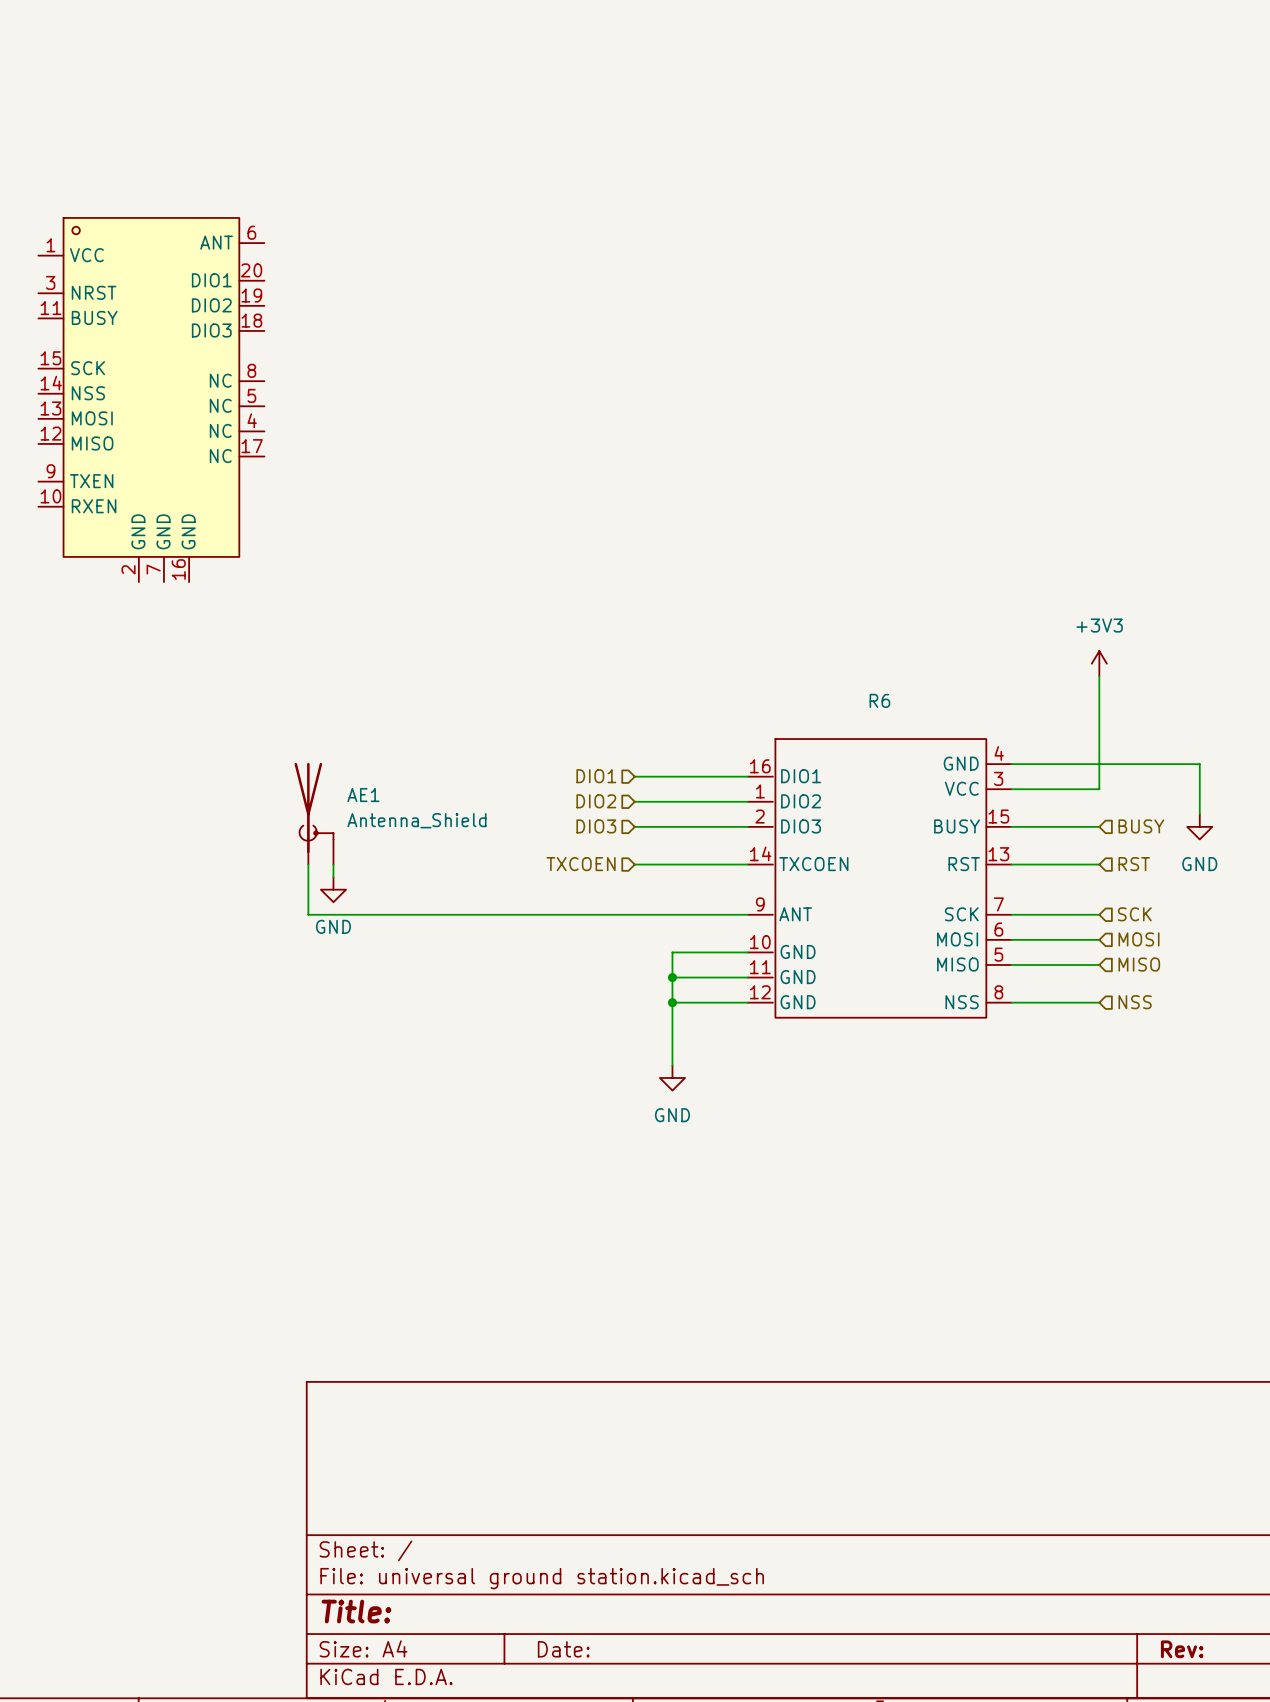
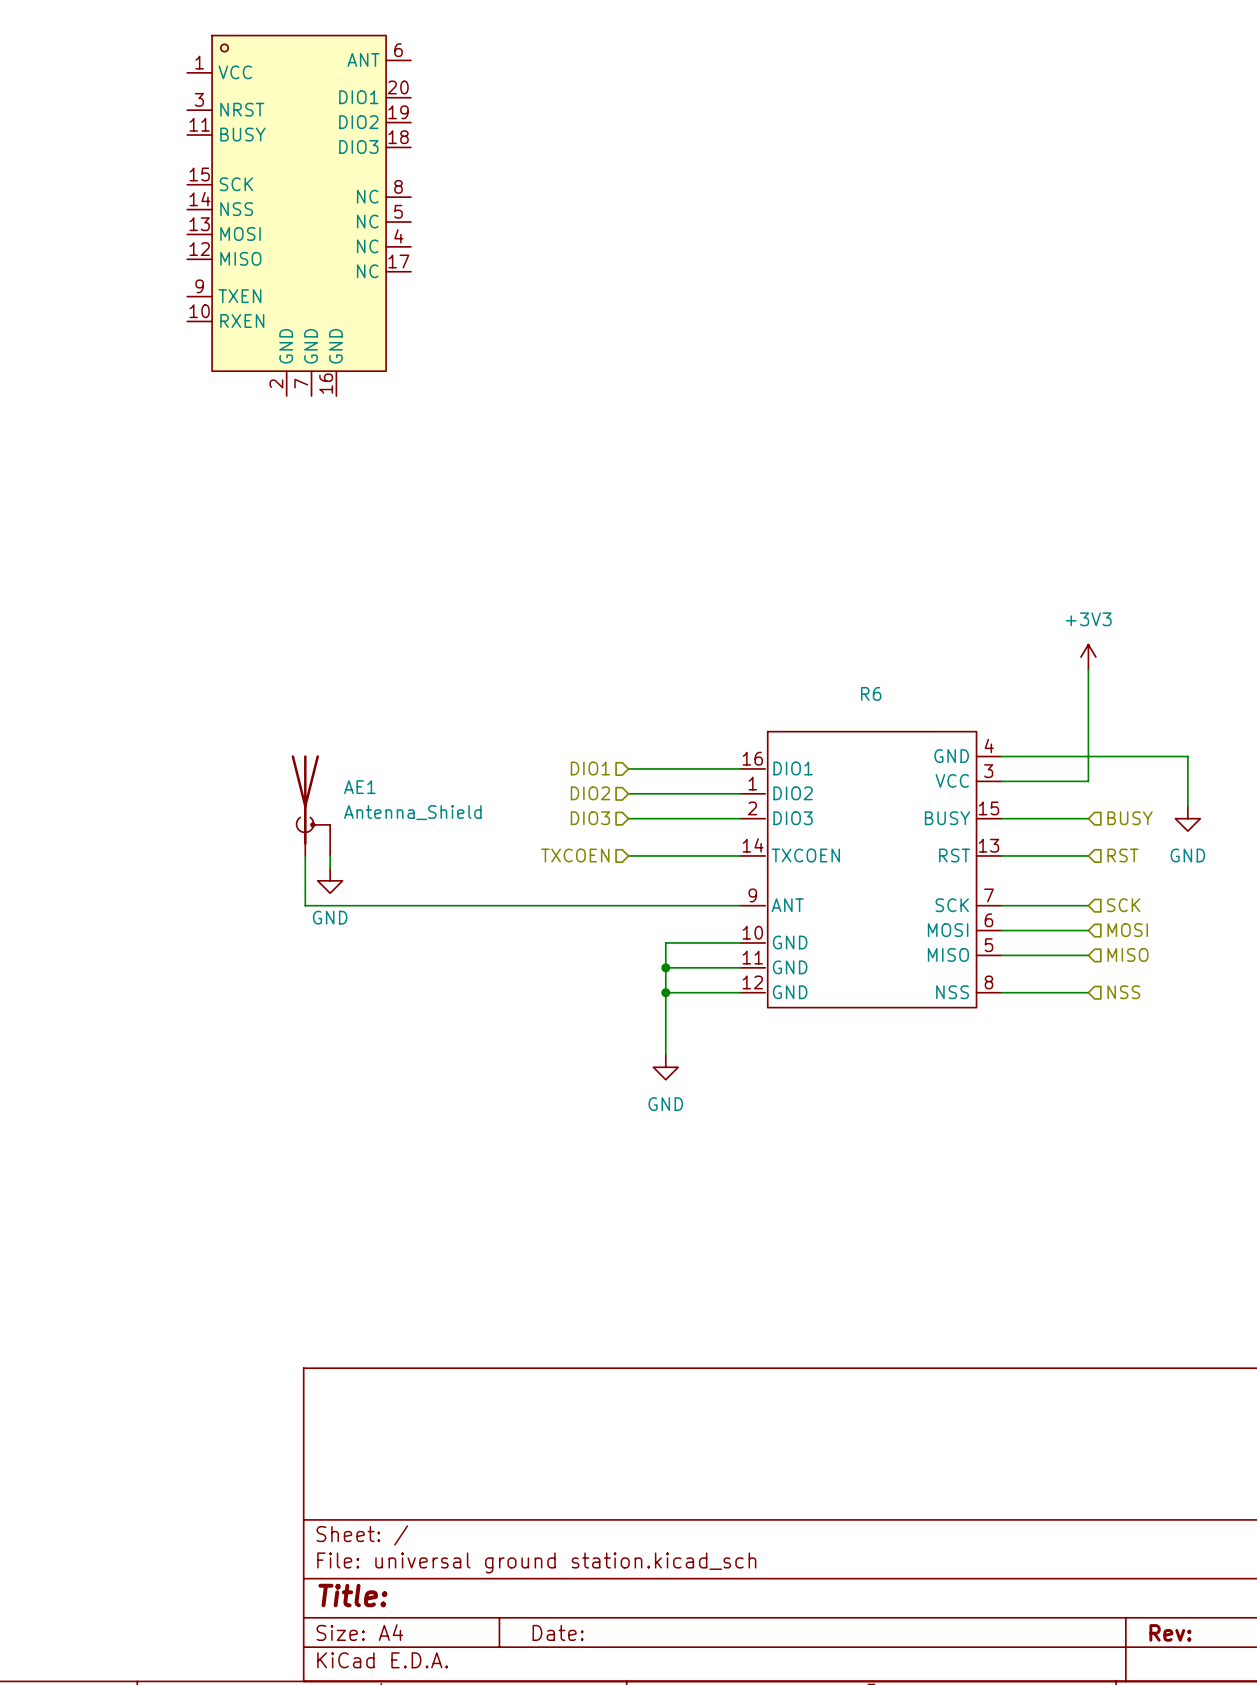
part position: (151, 400) -> (299, 215)

